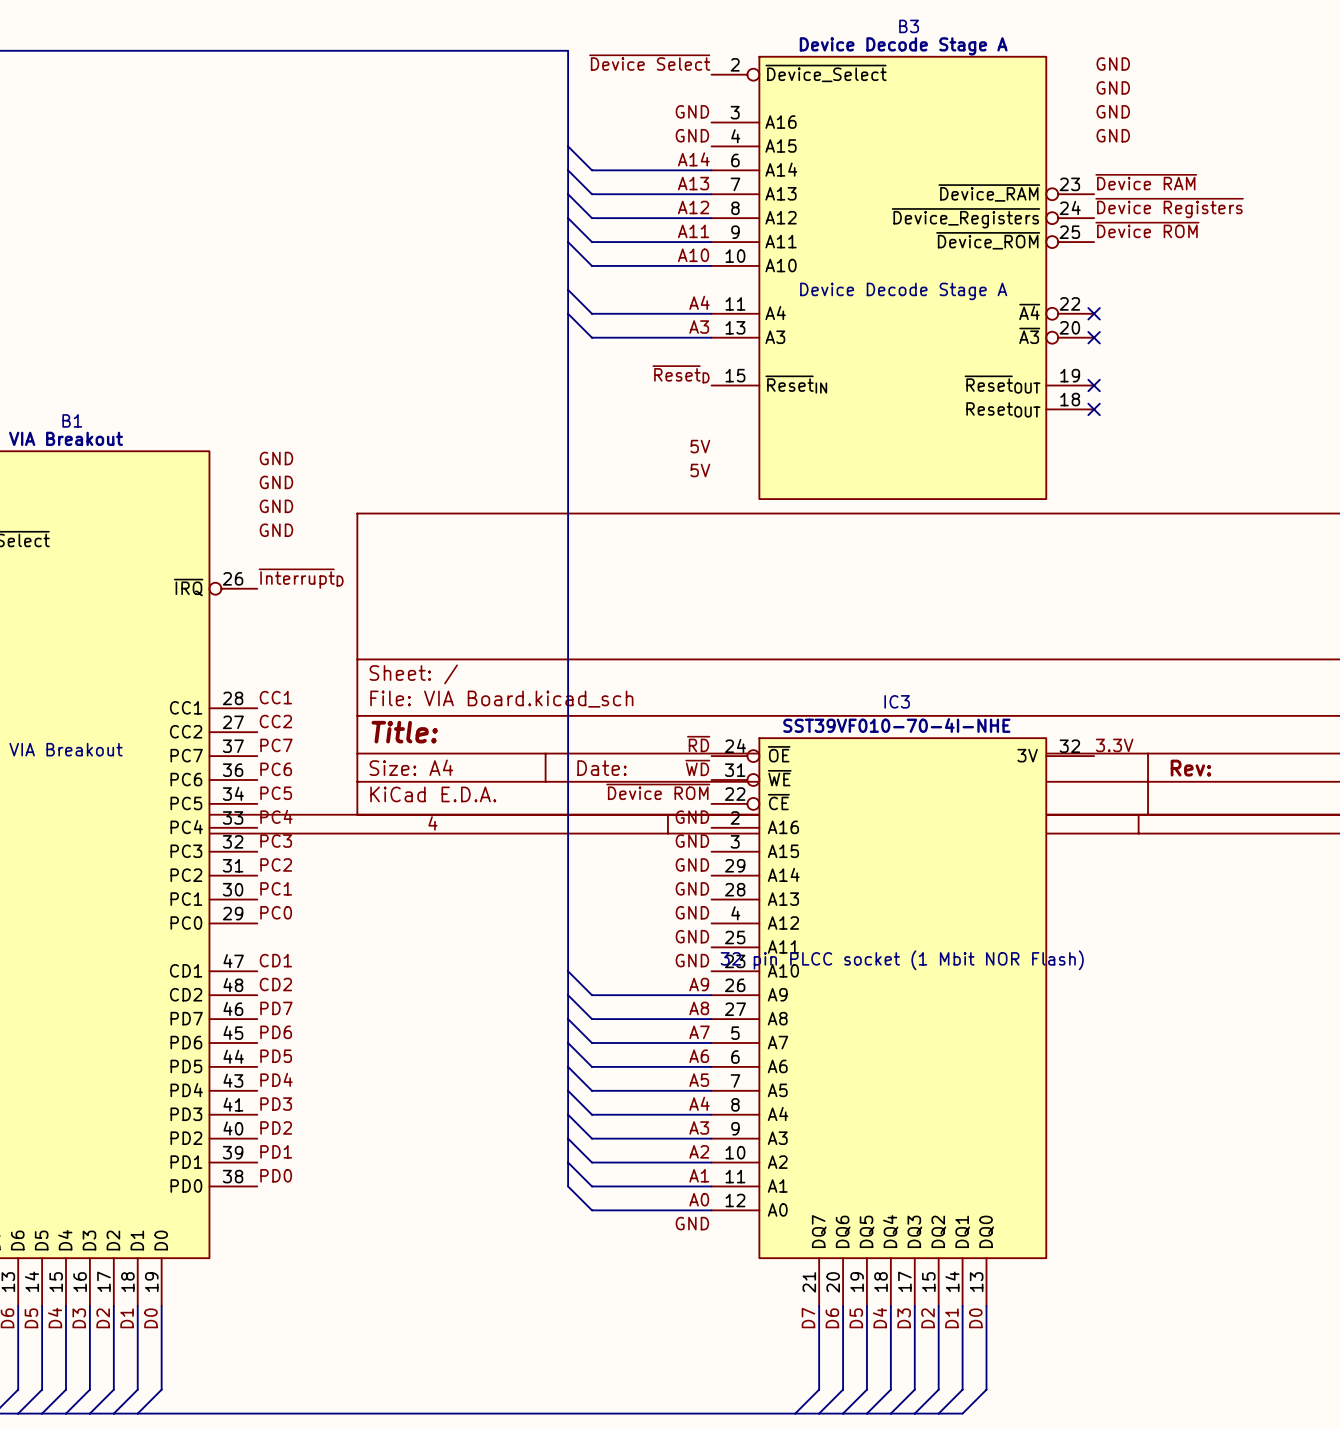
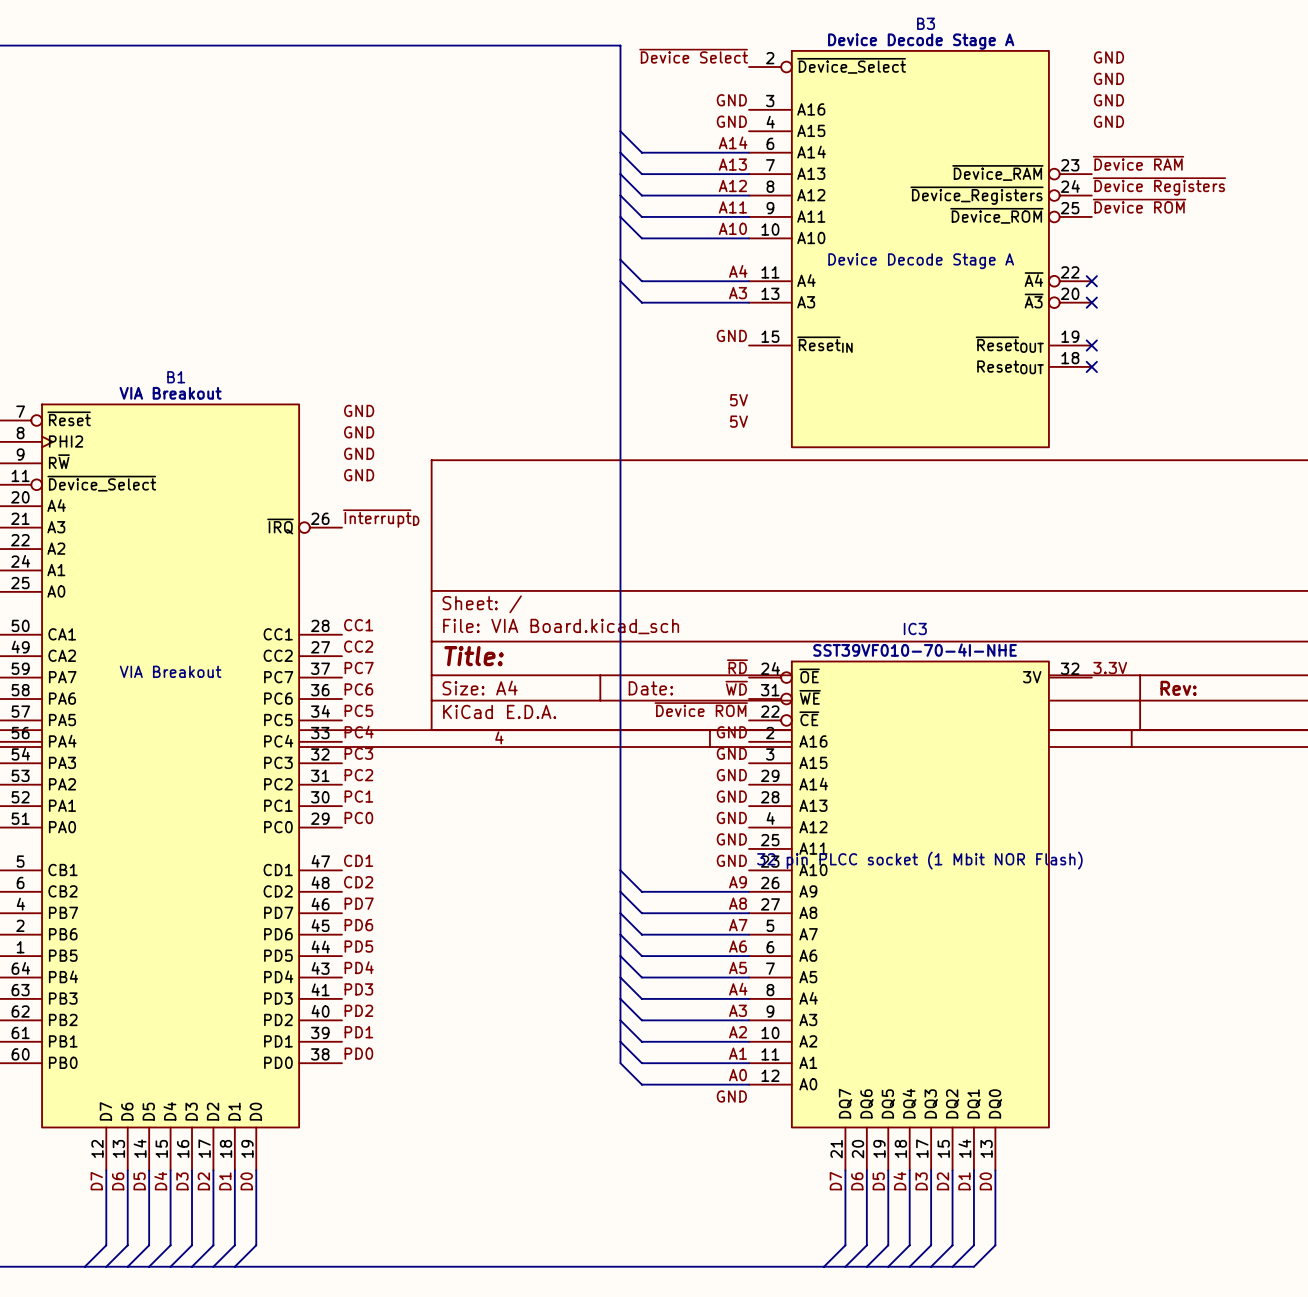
label: ~{Reset}D (681, 374) -> GND (731, 335)

